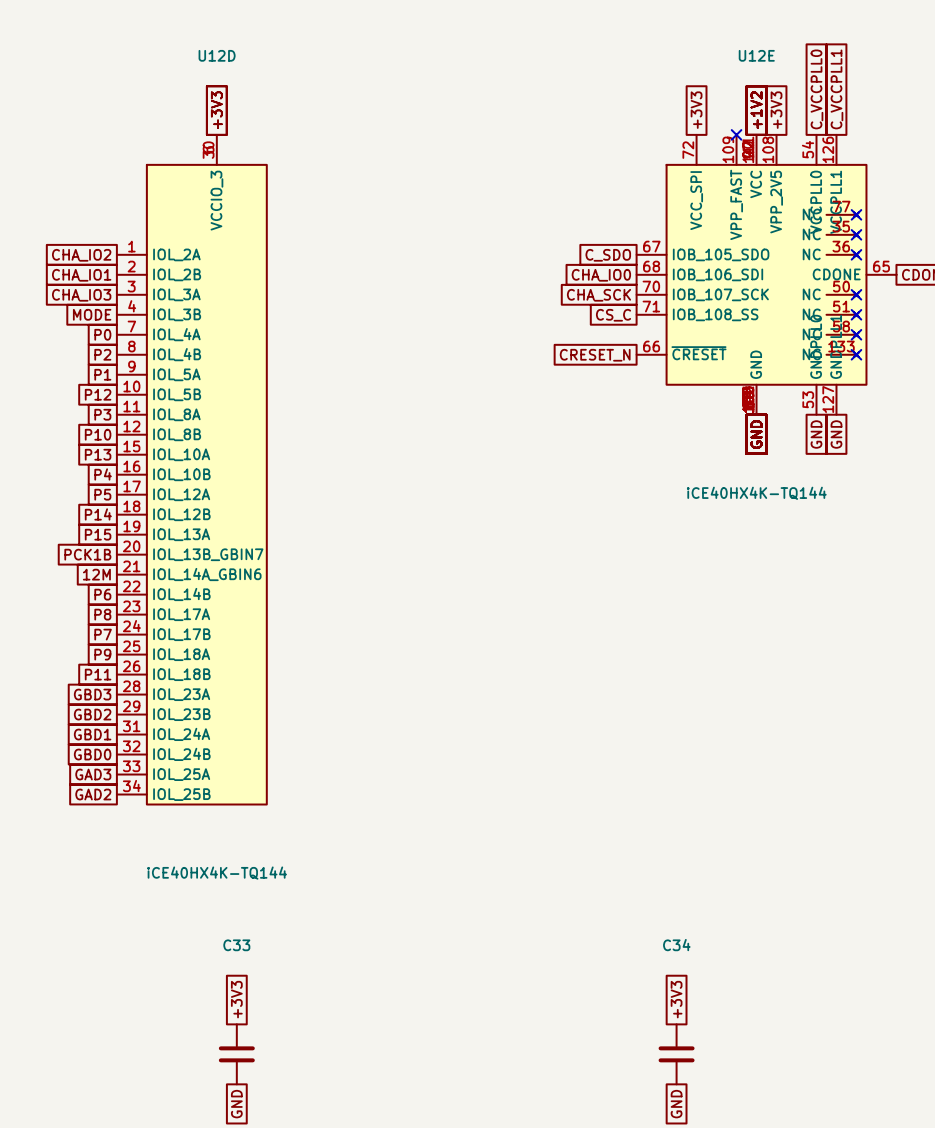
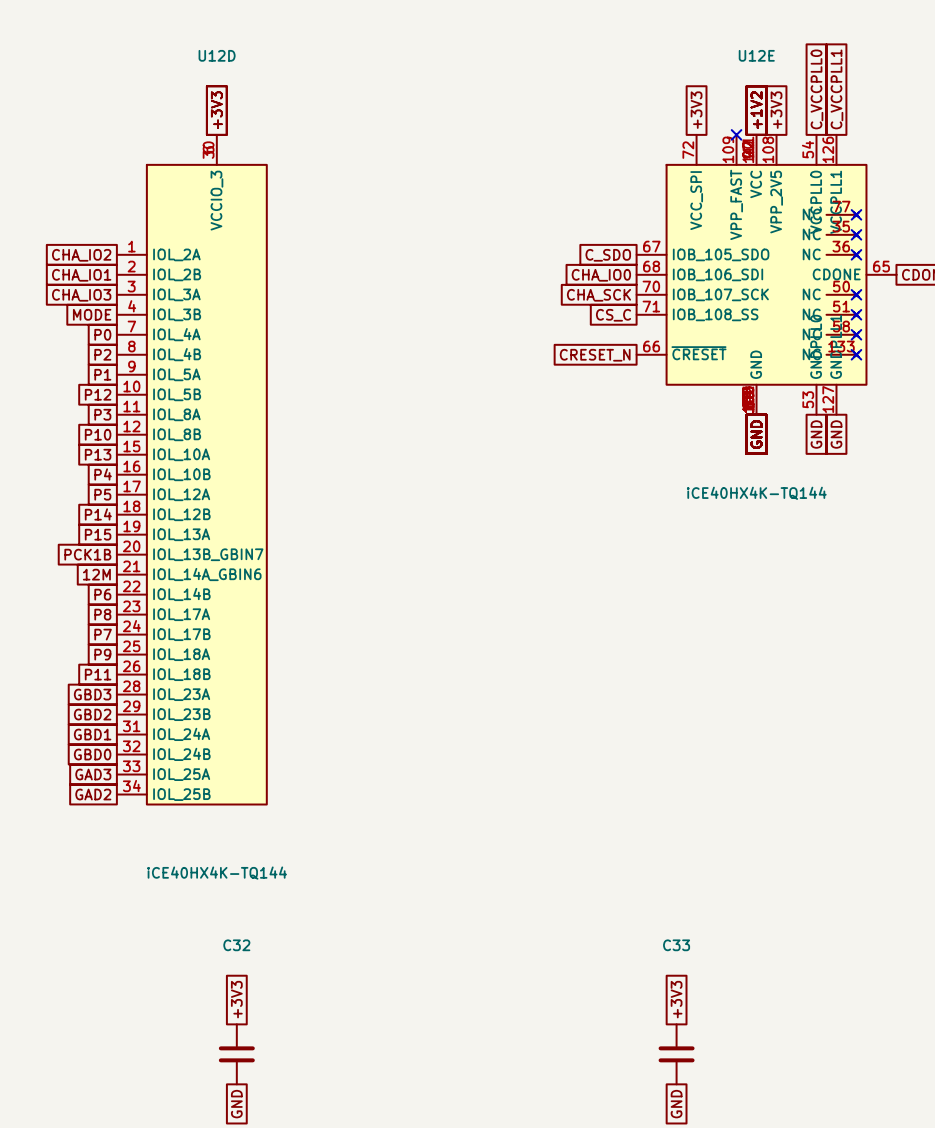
C33 name: C33 (236, 945) -> C32 (236, 945)
C34 name: C34 (676, 945) -> C33 (676, 945)

